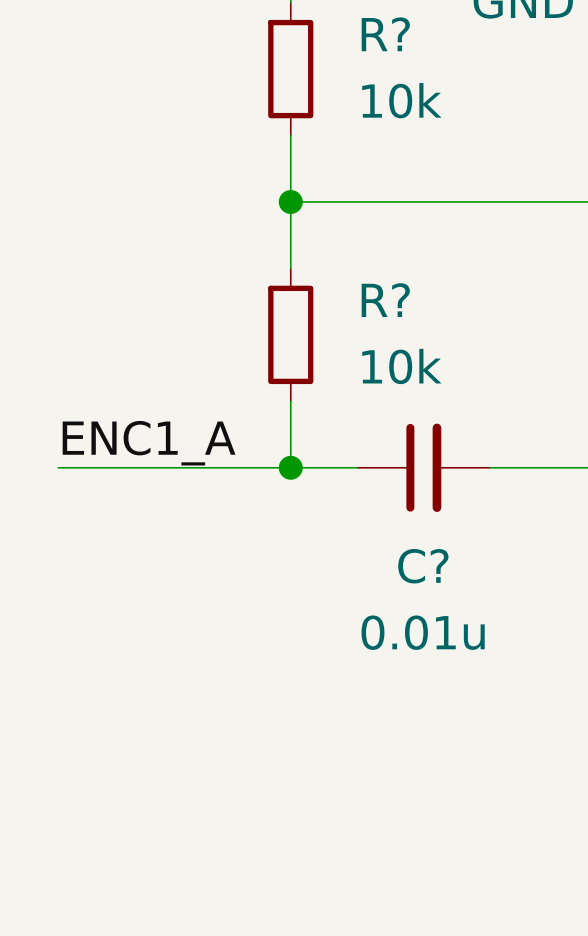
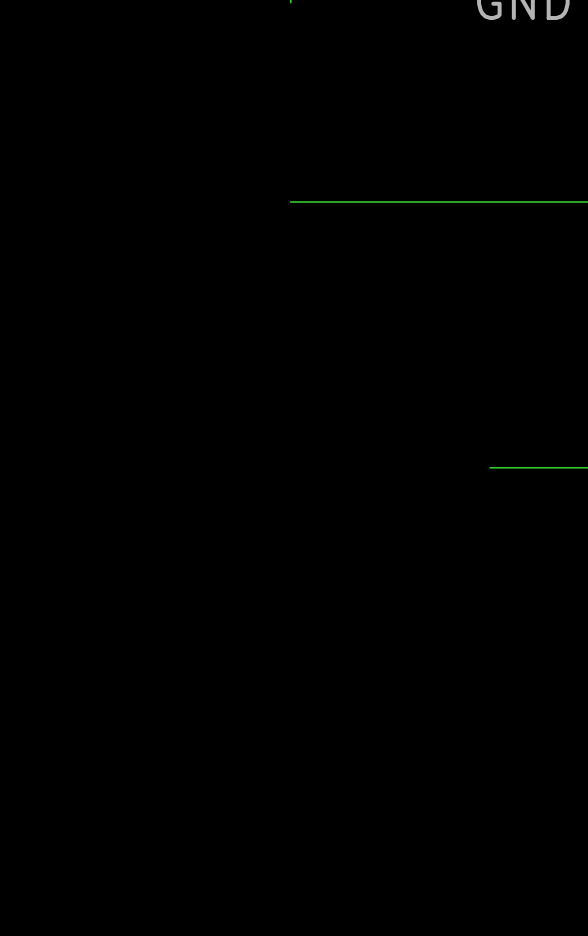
R?: 10k (290, 69) -> none
wire: (290, 135) (290, 268) -> none
junction: (290, 201) -> none
R?: 10k (290, 334) -> none
wire: (290, 401) (290, 467) -> none
label: ENC1_A (149, 443) -> none
wire: (58, 467) (357, 467) -> none
junction: (290, 467) -> none
C?: 0.01u (423, 467) -> none

